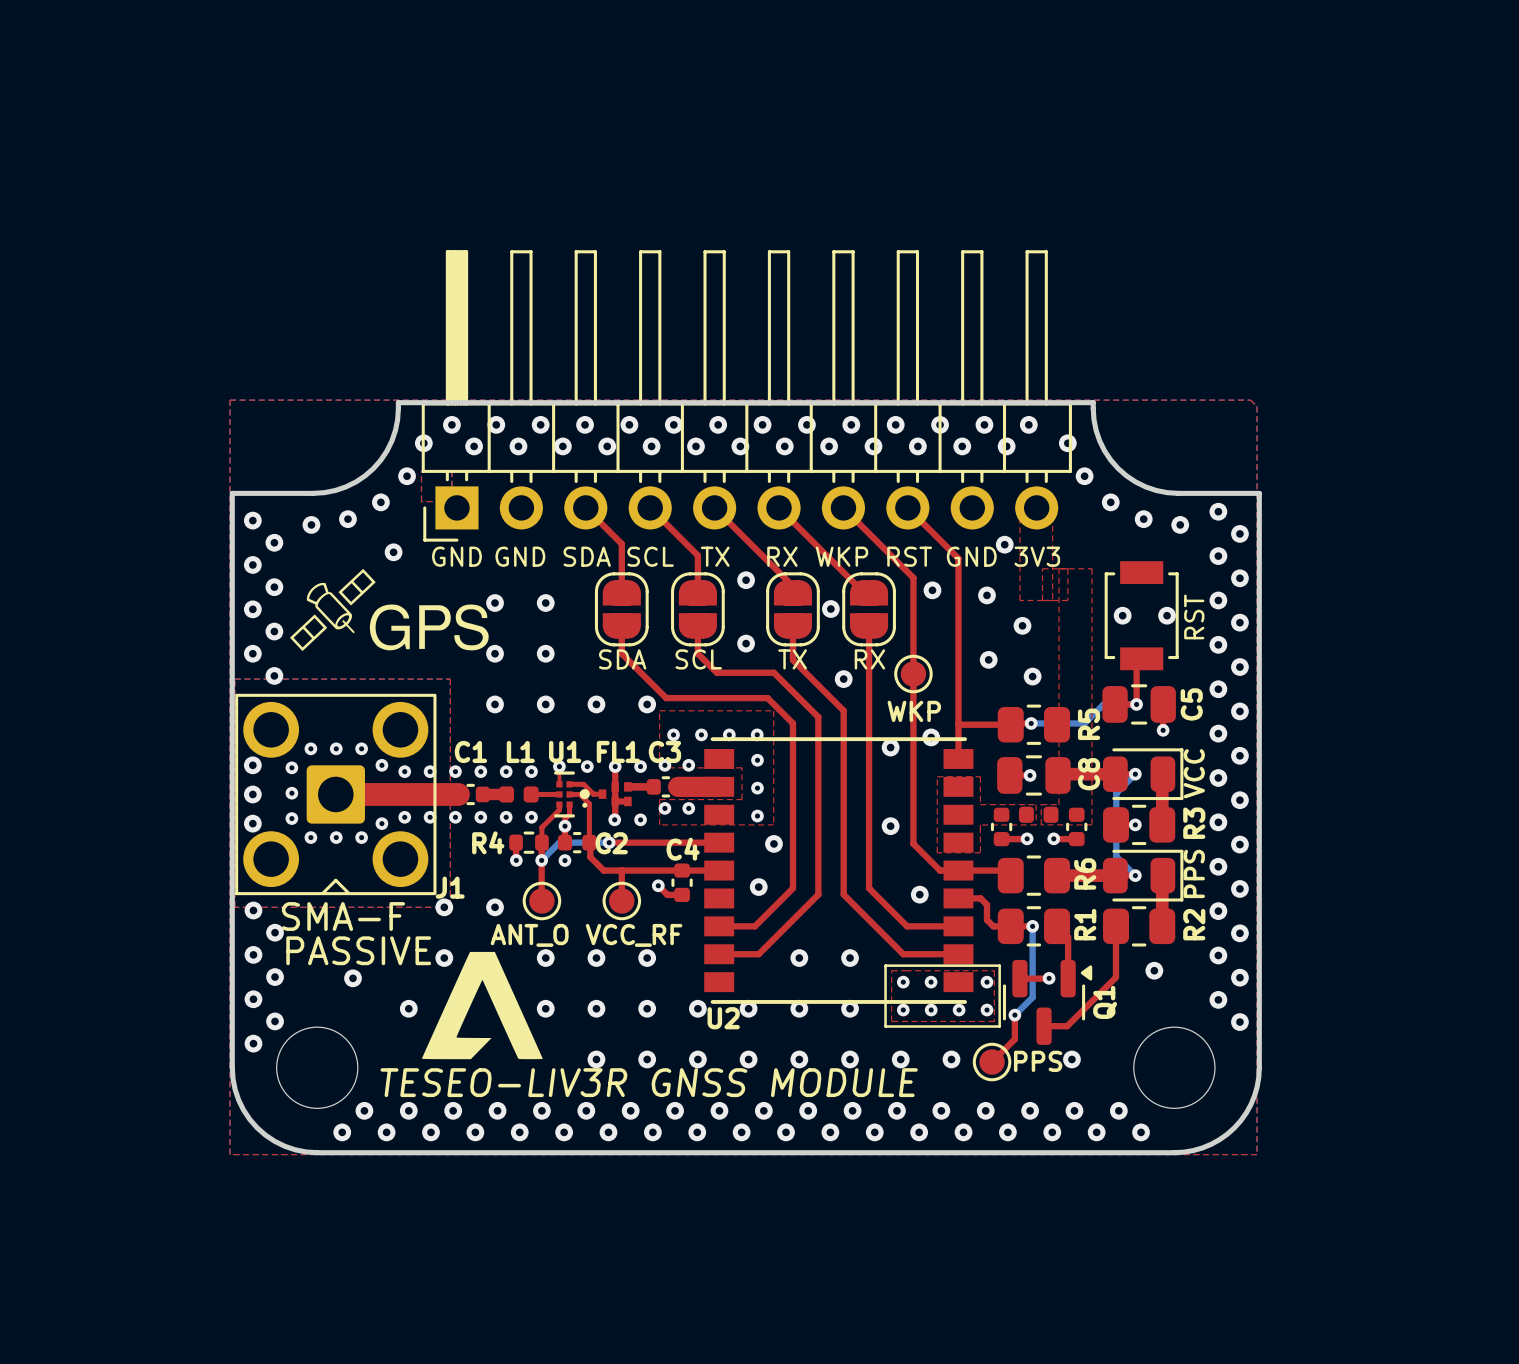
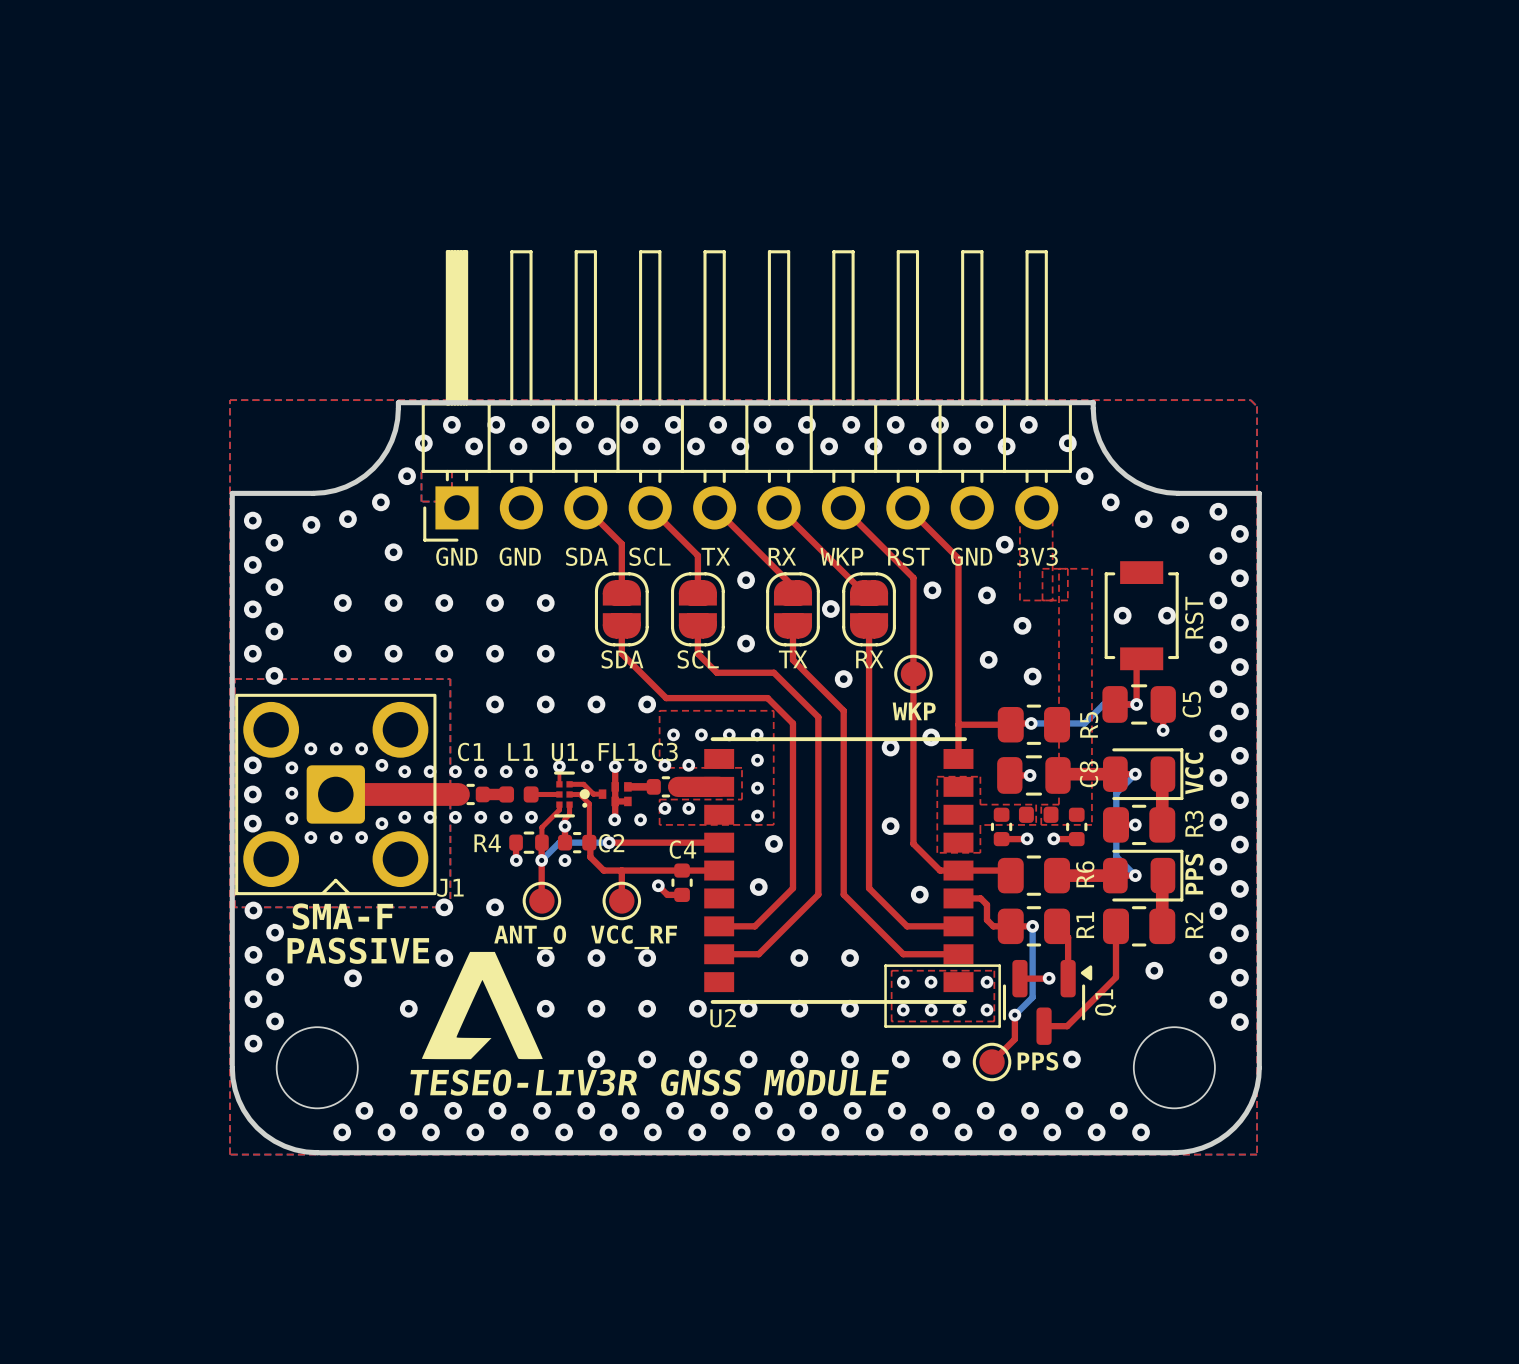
drawing: [290, 568, 489, 652] -> none
via: none -> (342, 603)
via: none -> (393, 603)
via: none -> (444, 603)
via: none -> (342, 653)
via: none -> (393, 653)
via: none -> (444, 653)

